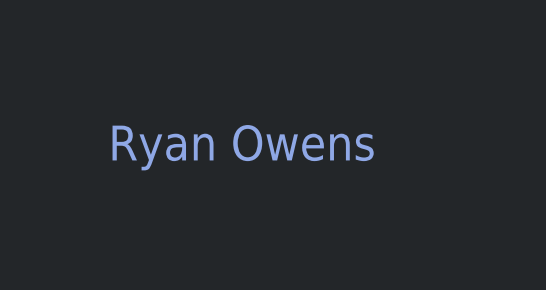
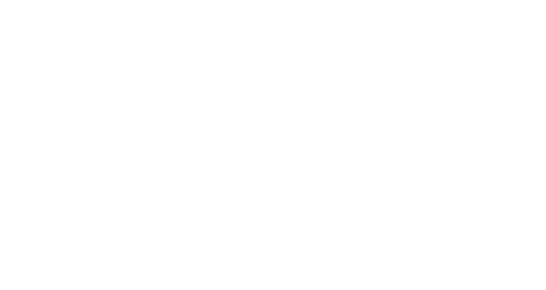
text: Ryan Owens (243, 147) -> none

